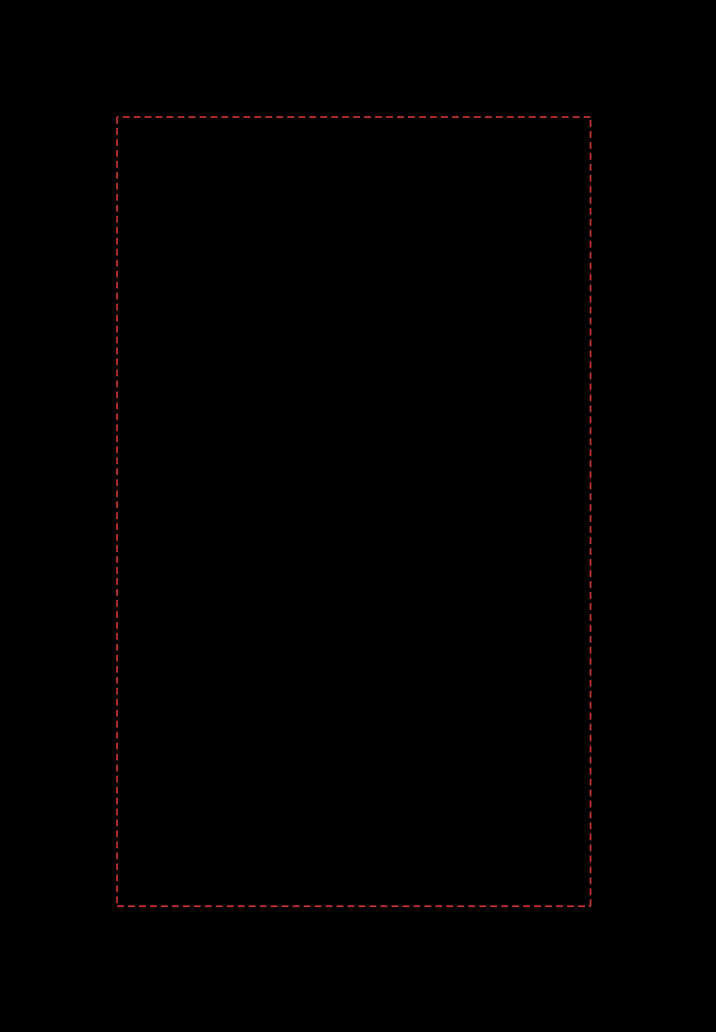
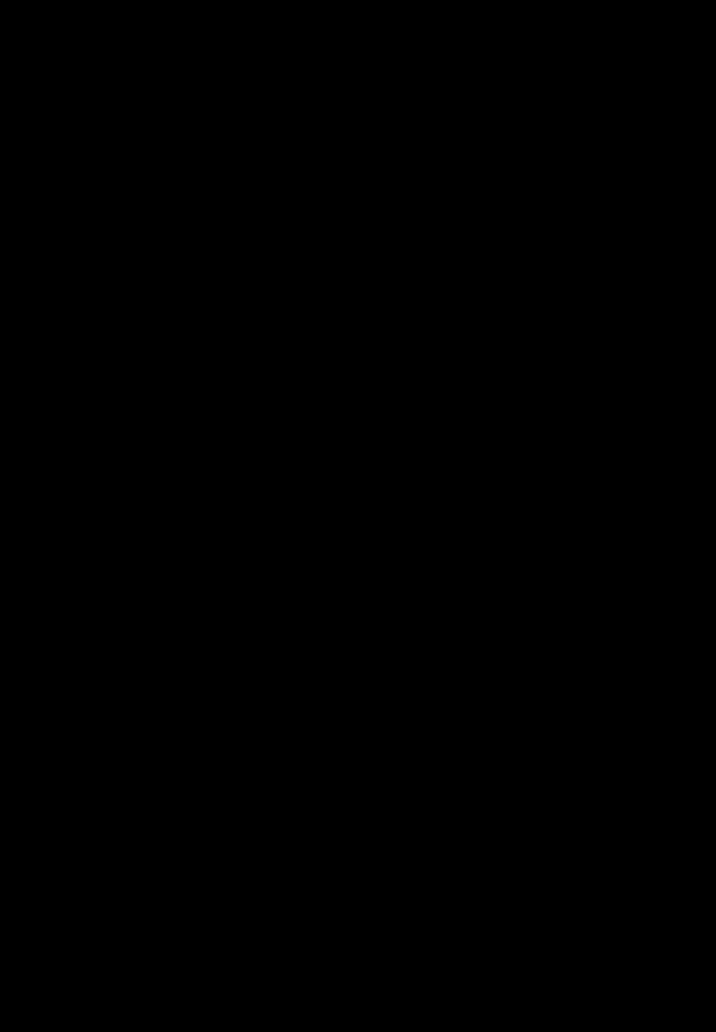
zone outline: (117, 117) (590, 117) (590, 906) (117, 906) (117, 117) -> none

